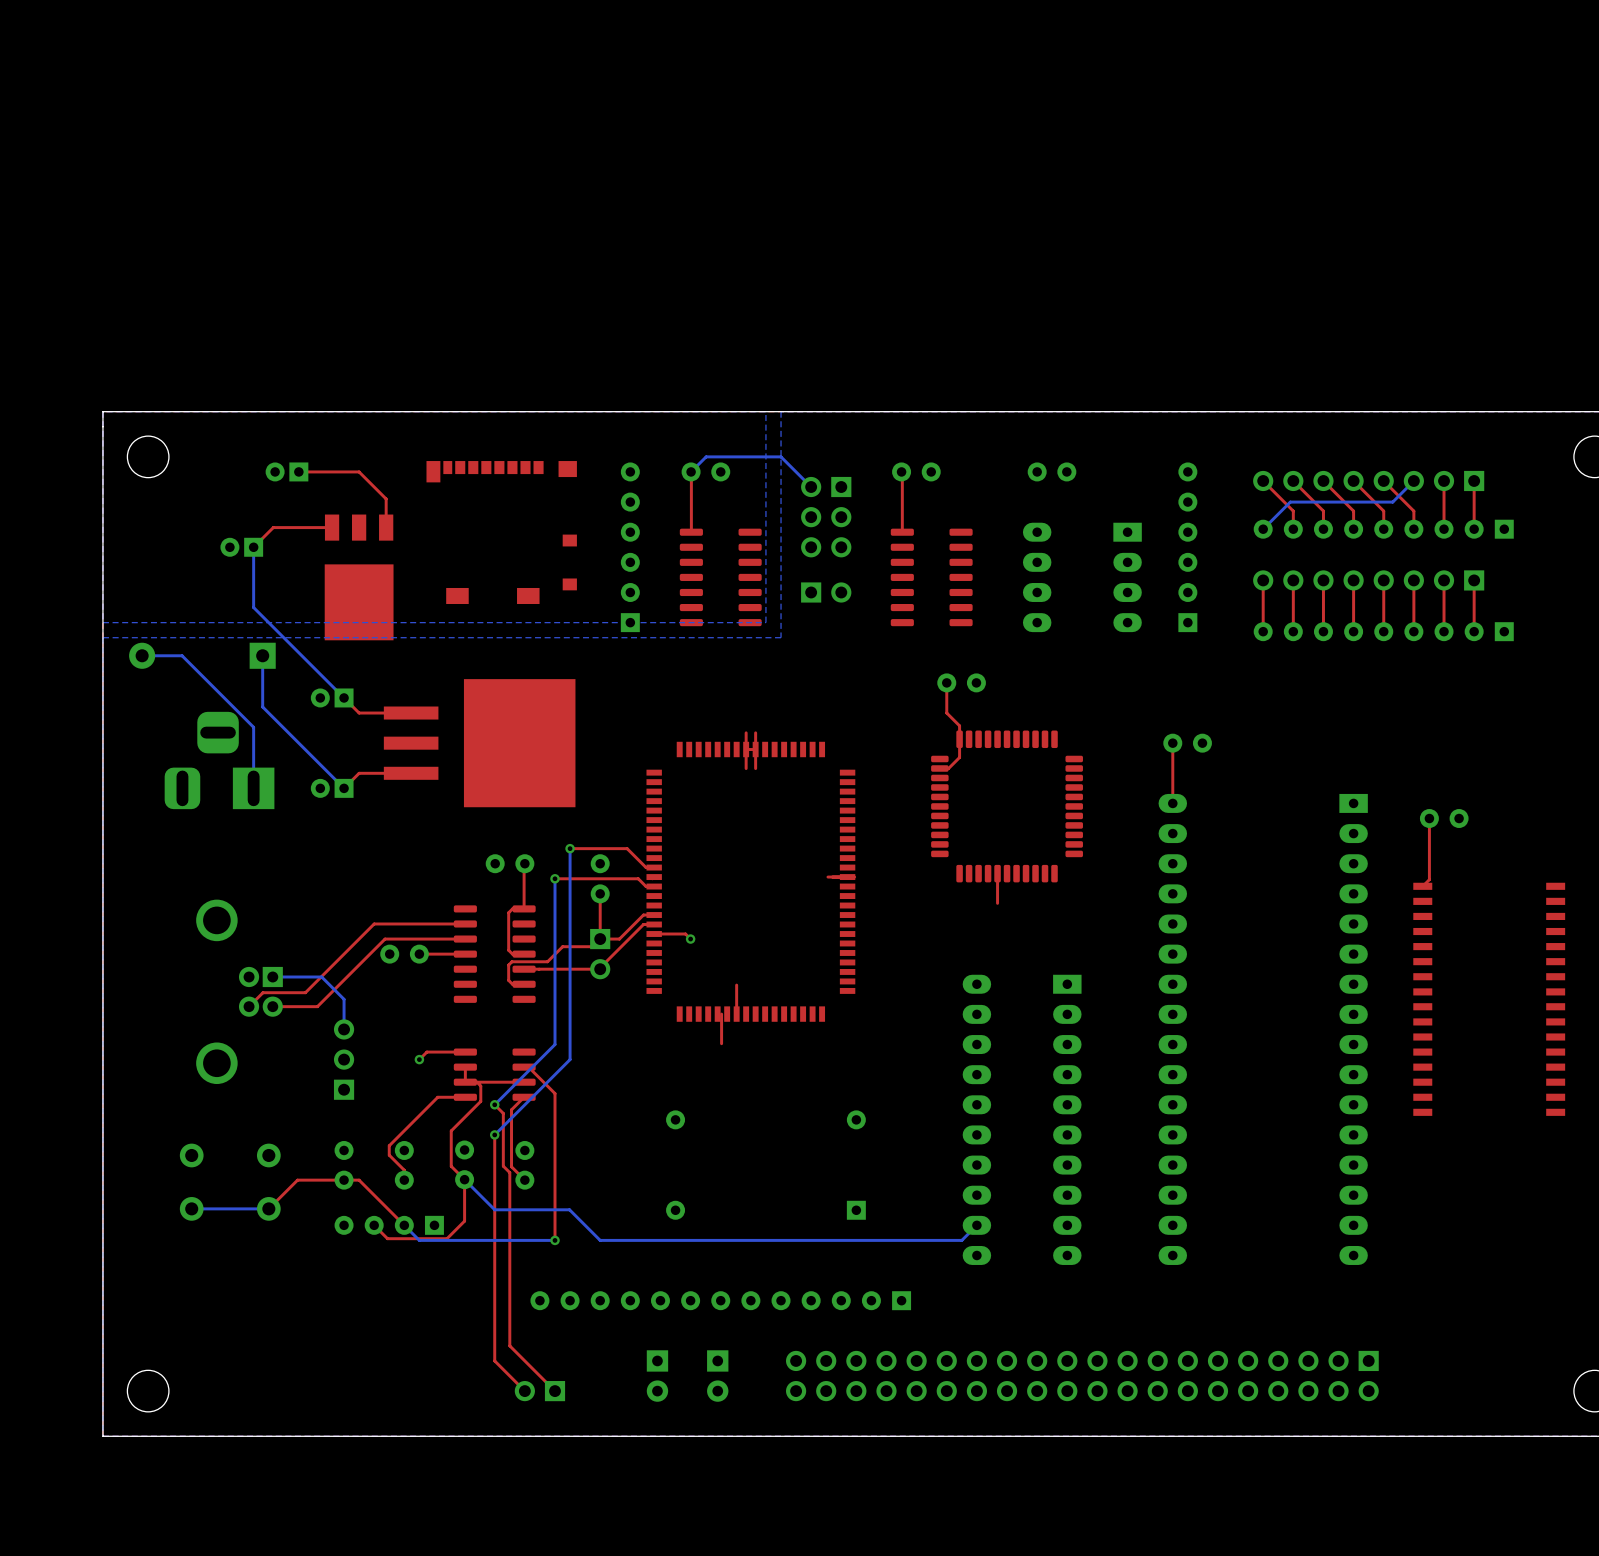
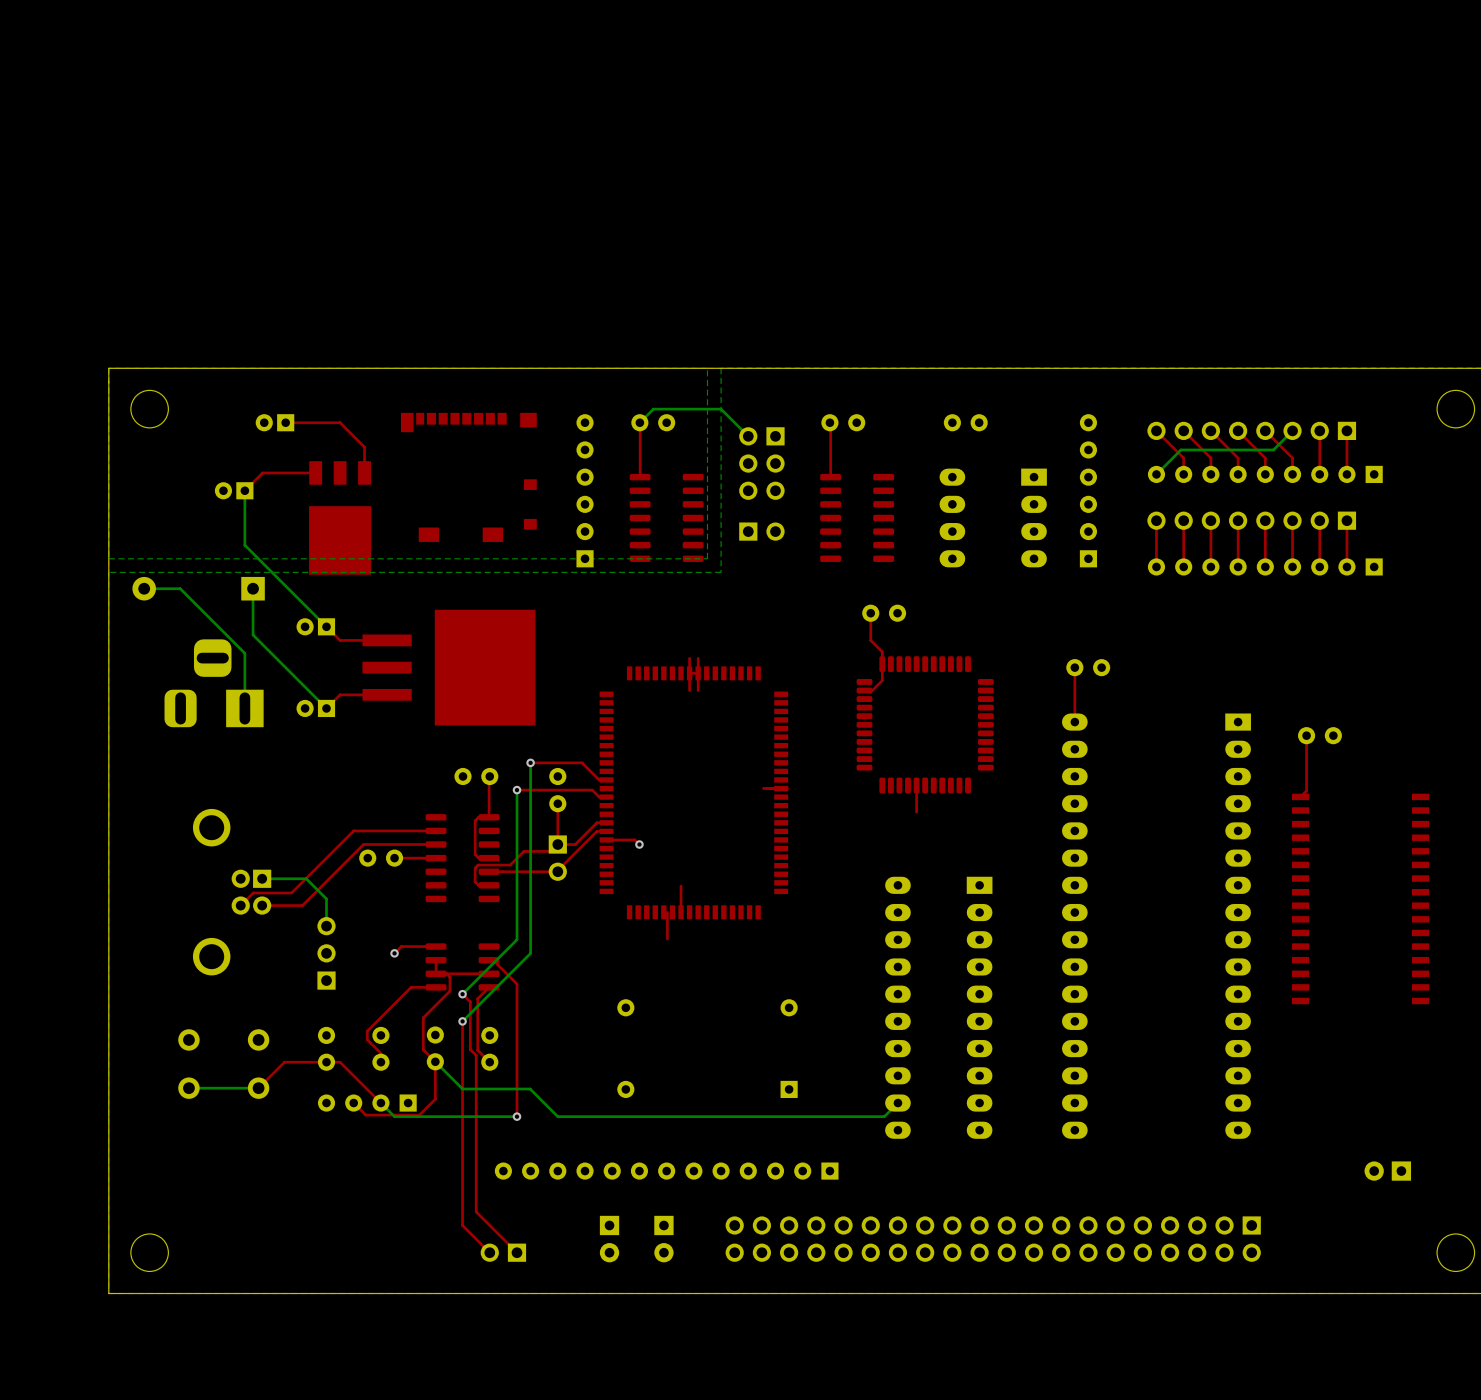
part: none -> (1387, 1171)

